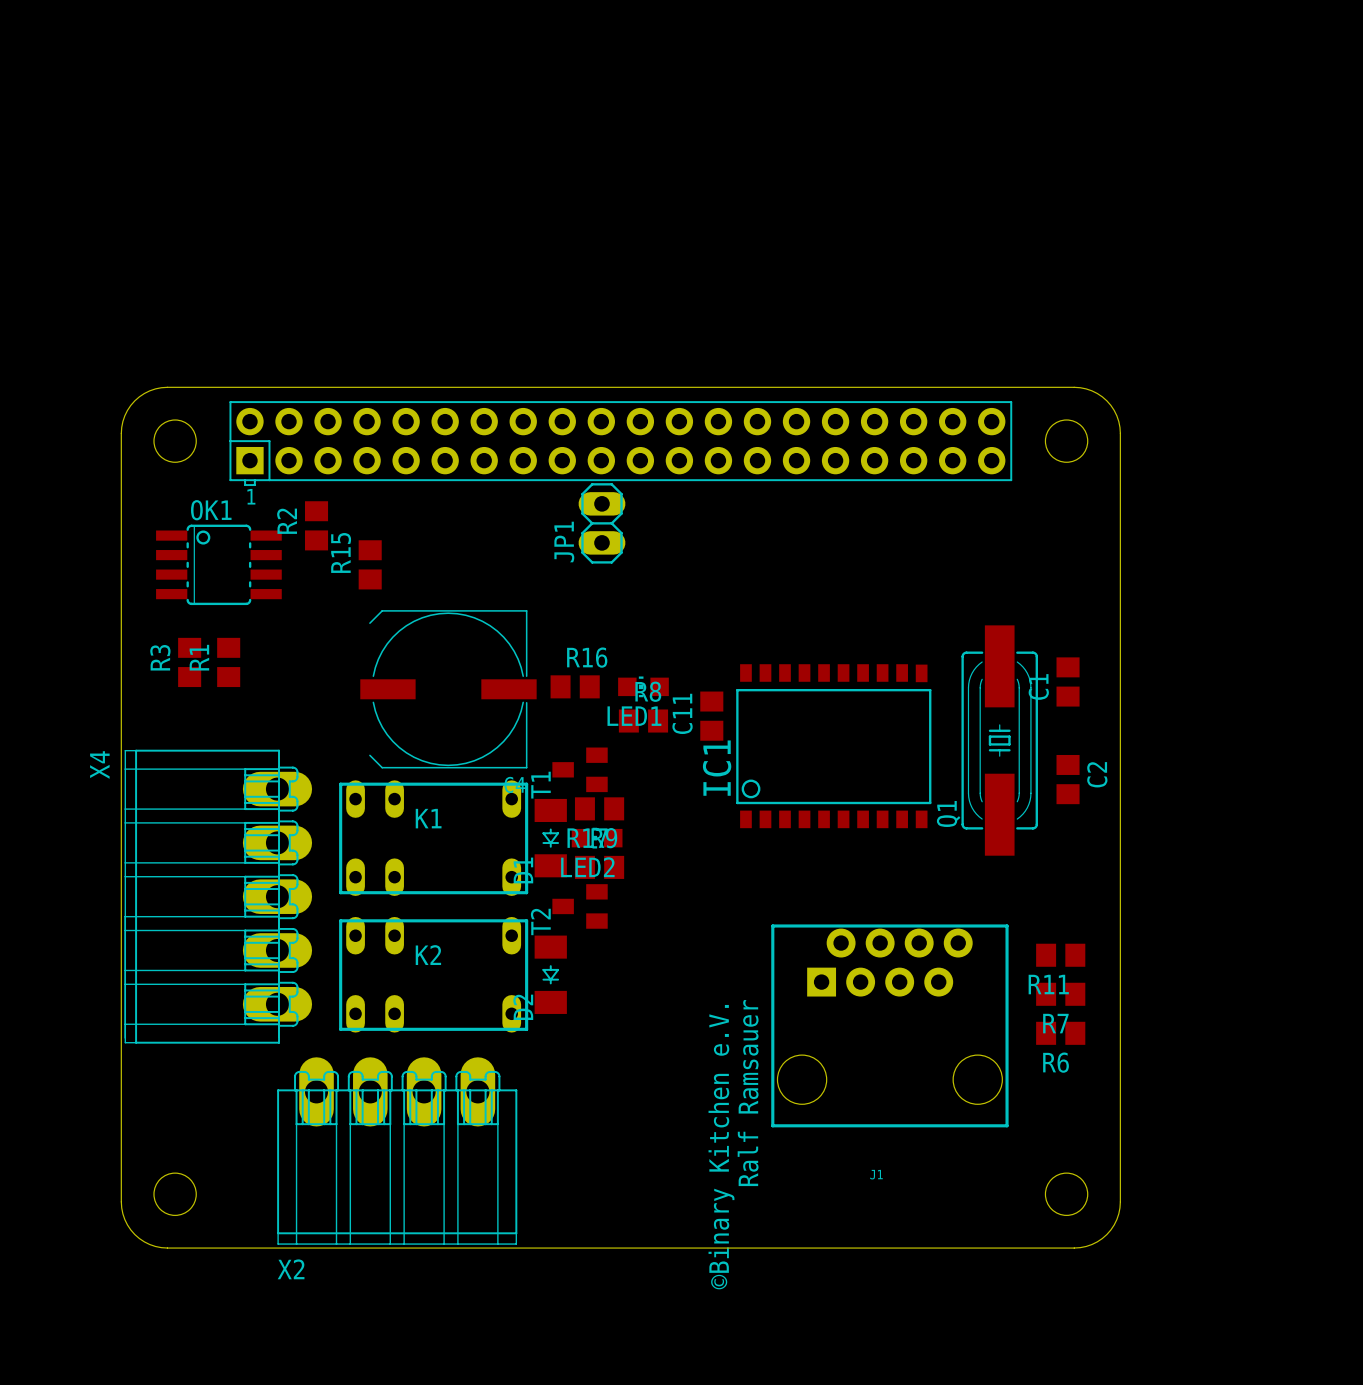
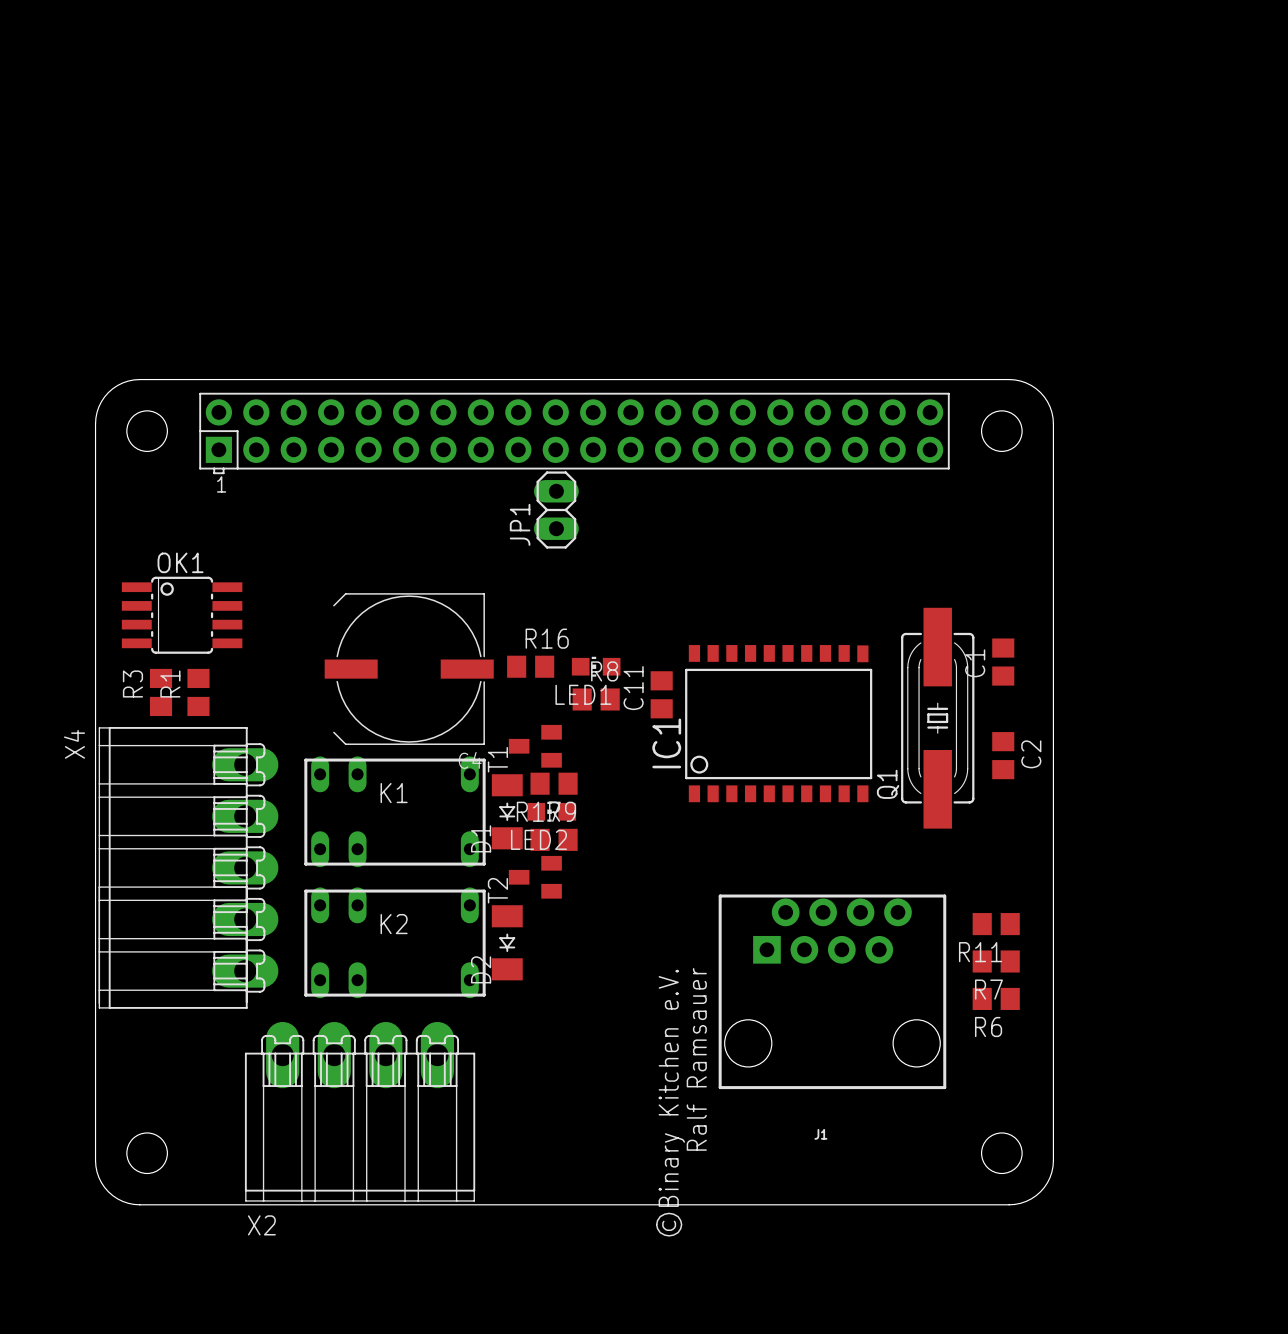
R2: (316, 525) -> none
OK1 position: (218, 564) -> (182, 615)
R15: (370, 564) -> none
R3 position: (189, 662) -> (161, 692)
R1 position: (228, 662) -> (198, 692)

